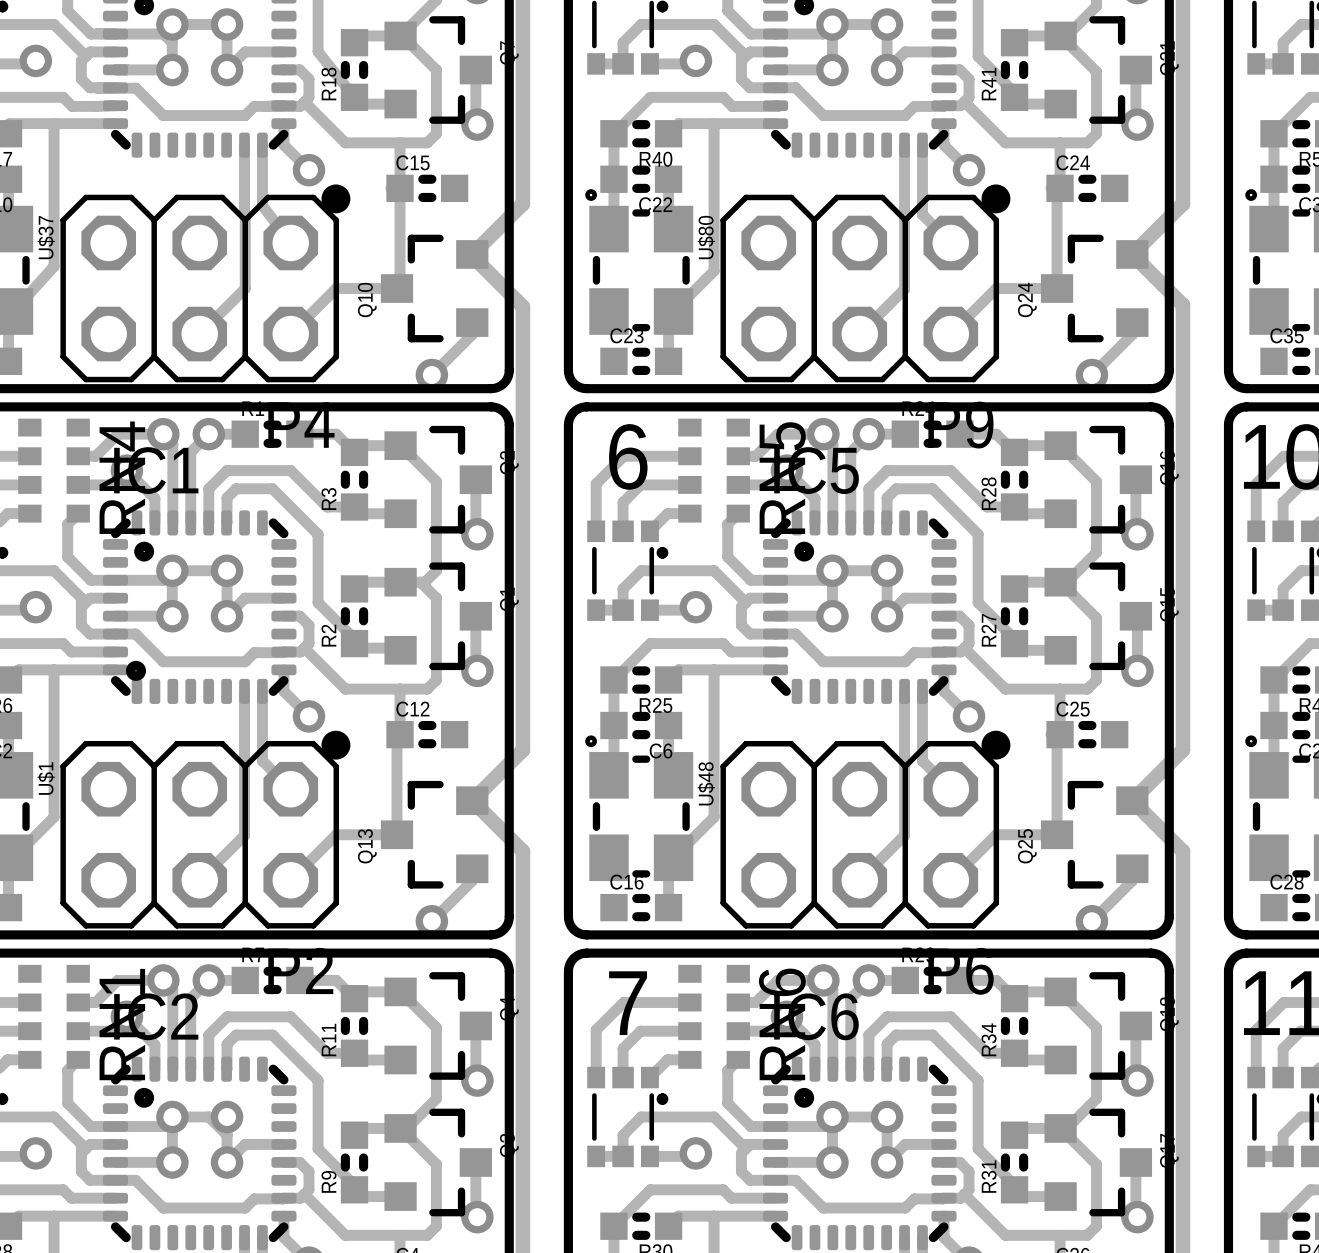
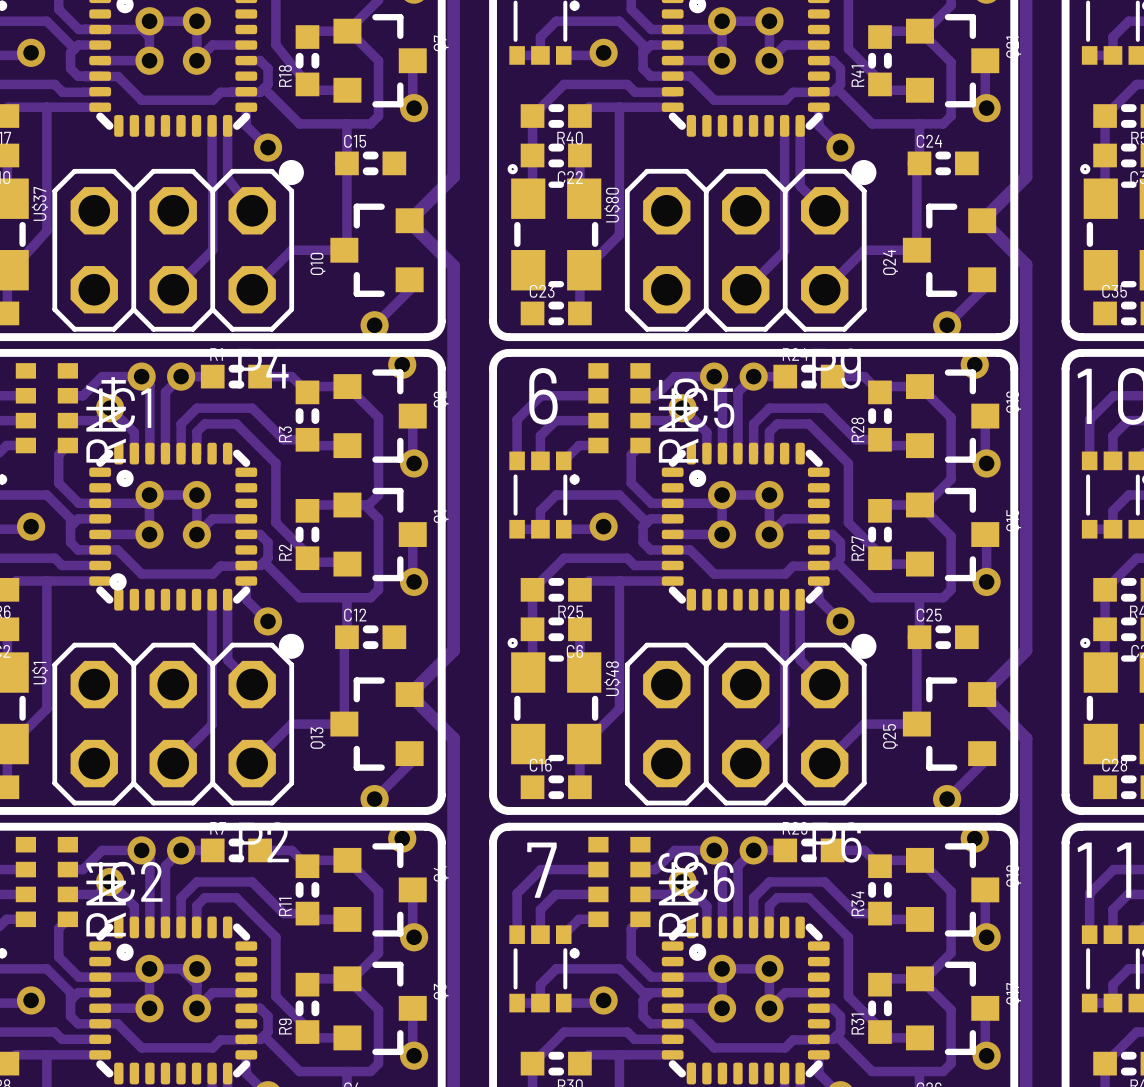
via: none -> (402, 364)
via: none -> (974, 364)
via: none -> (402, 838)
via: none -> (974, 838)

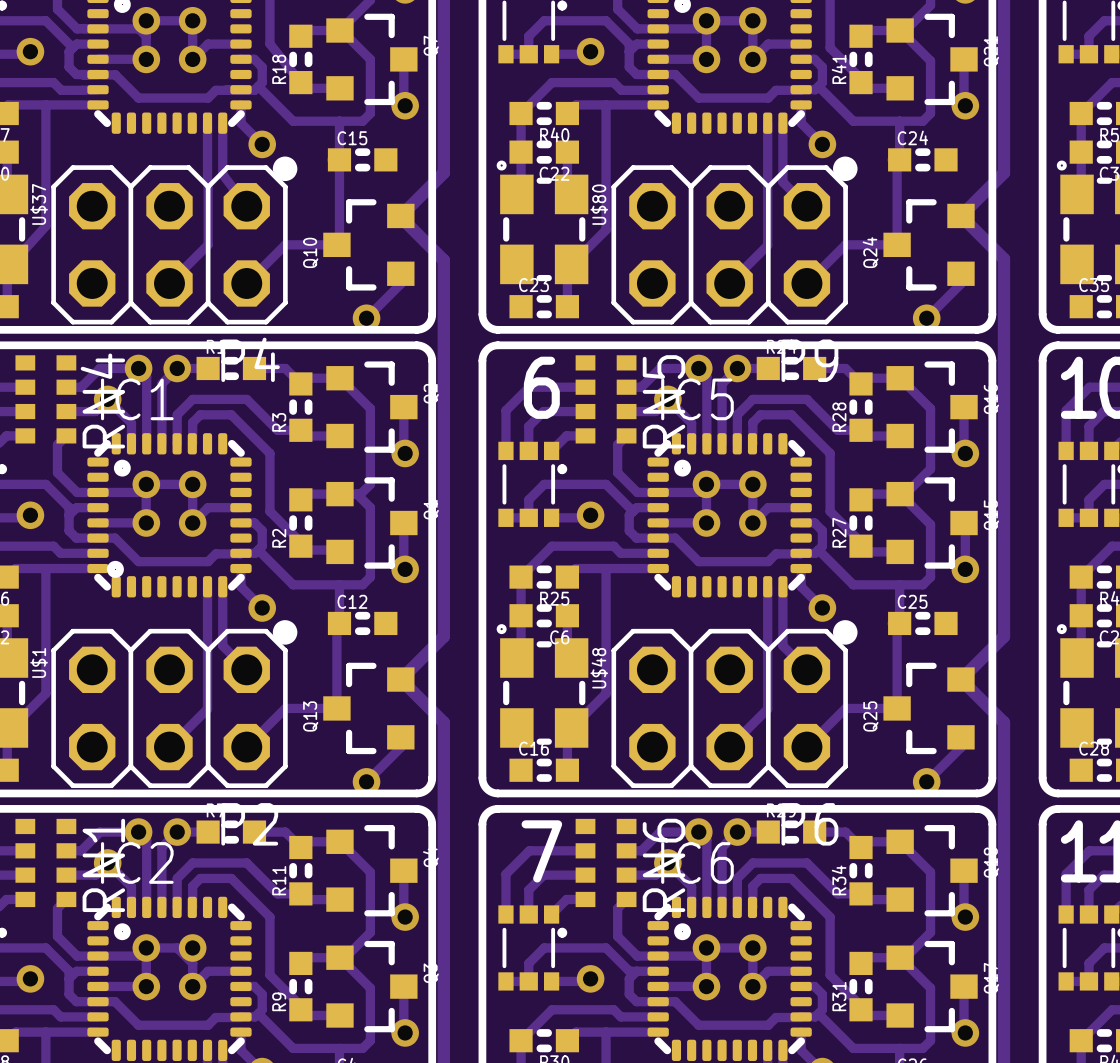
via: (402, 364) -> none
via: (974, 364) -> none
via: (402, 838) -> none
via: (974, 838) -> none

